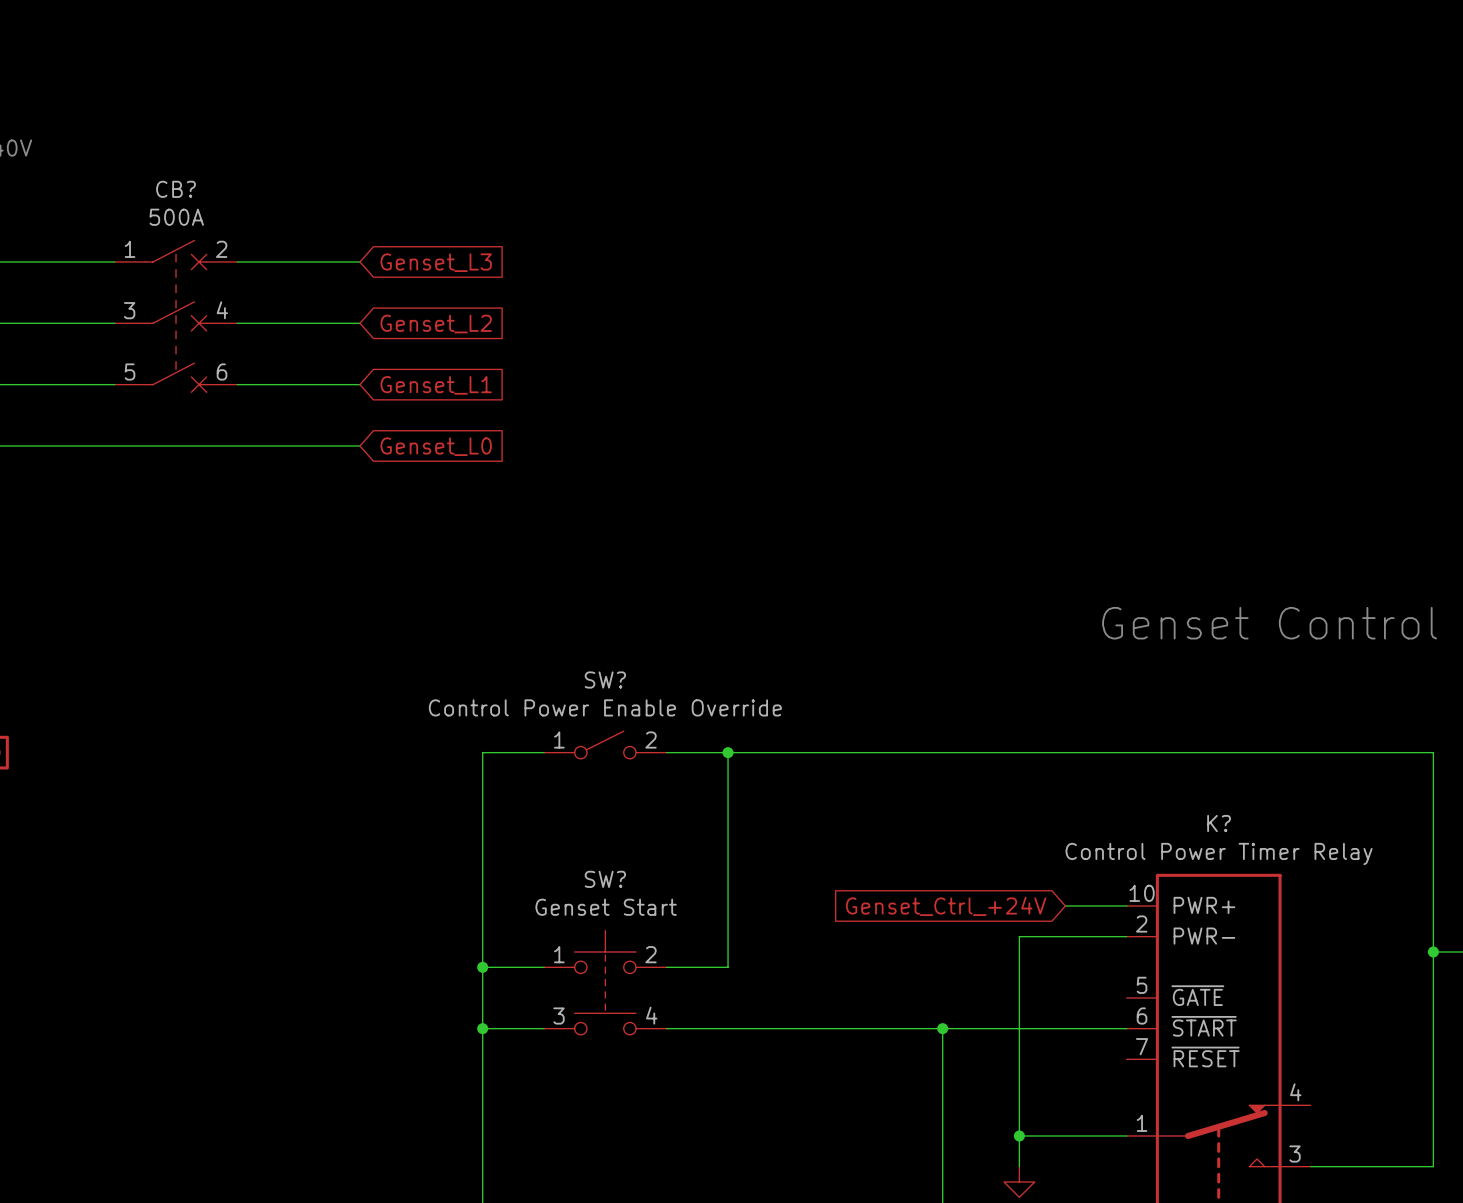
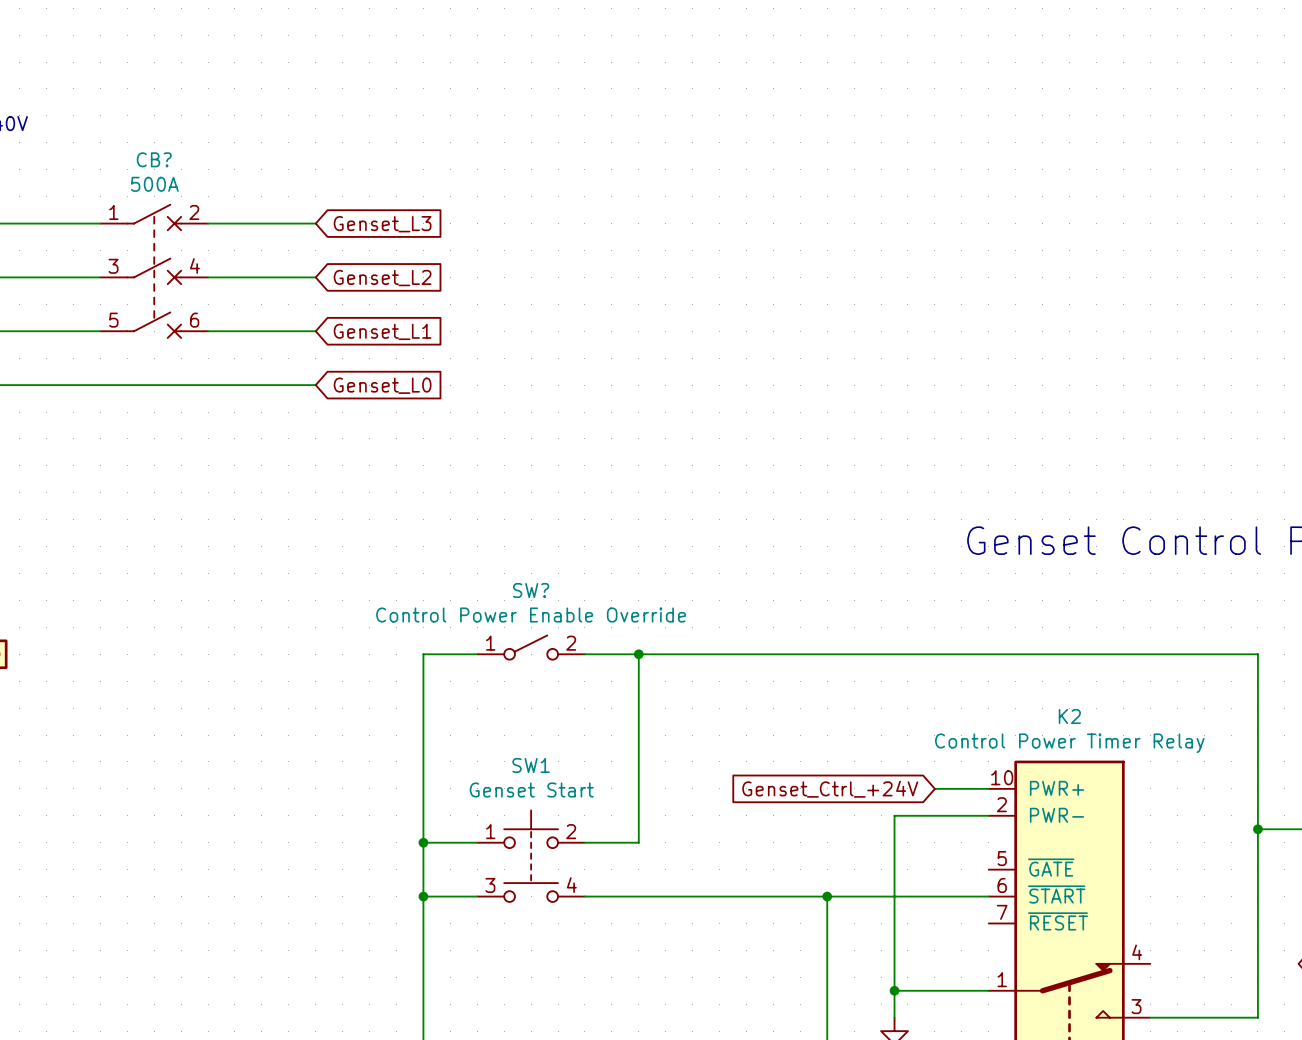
K? name: K? (1219, 823) -> K2 (1069, 716)
SW? name: SW? (605, 879) -> SW1 (531, 765)

